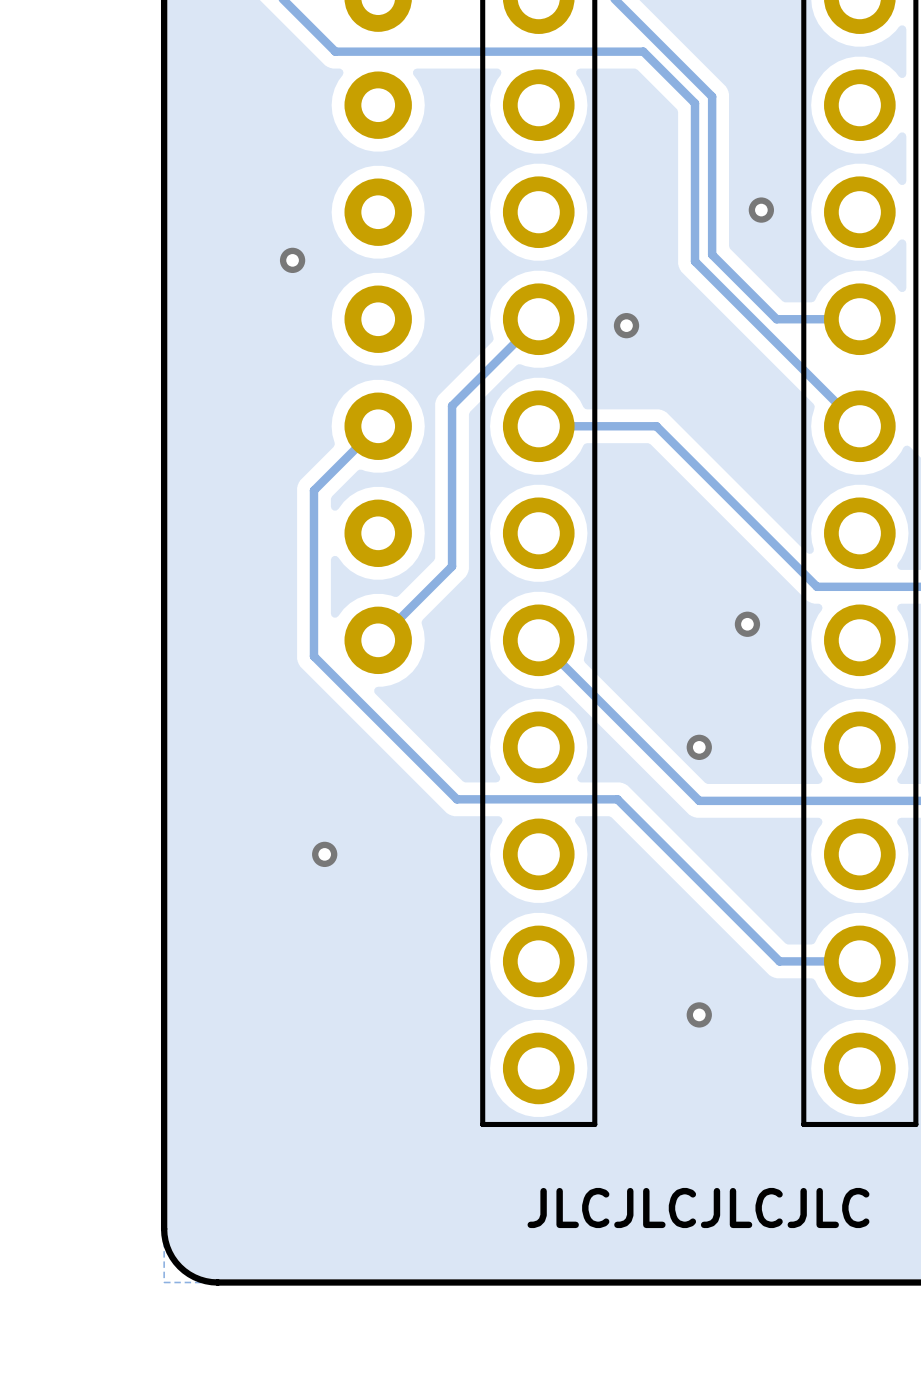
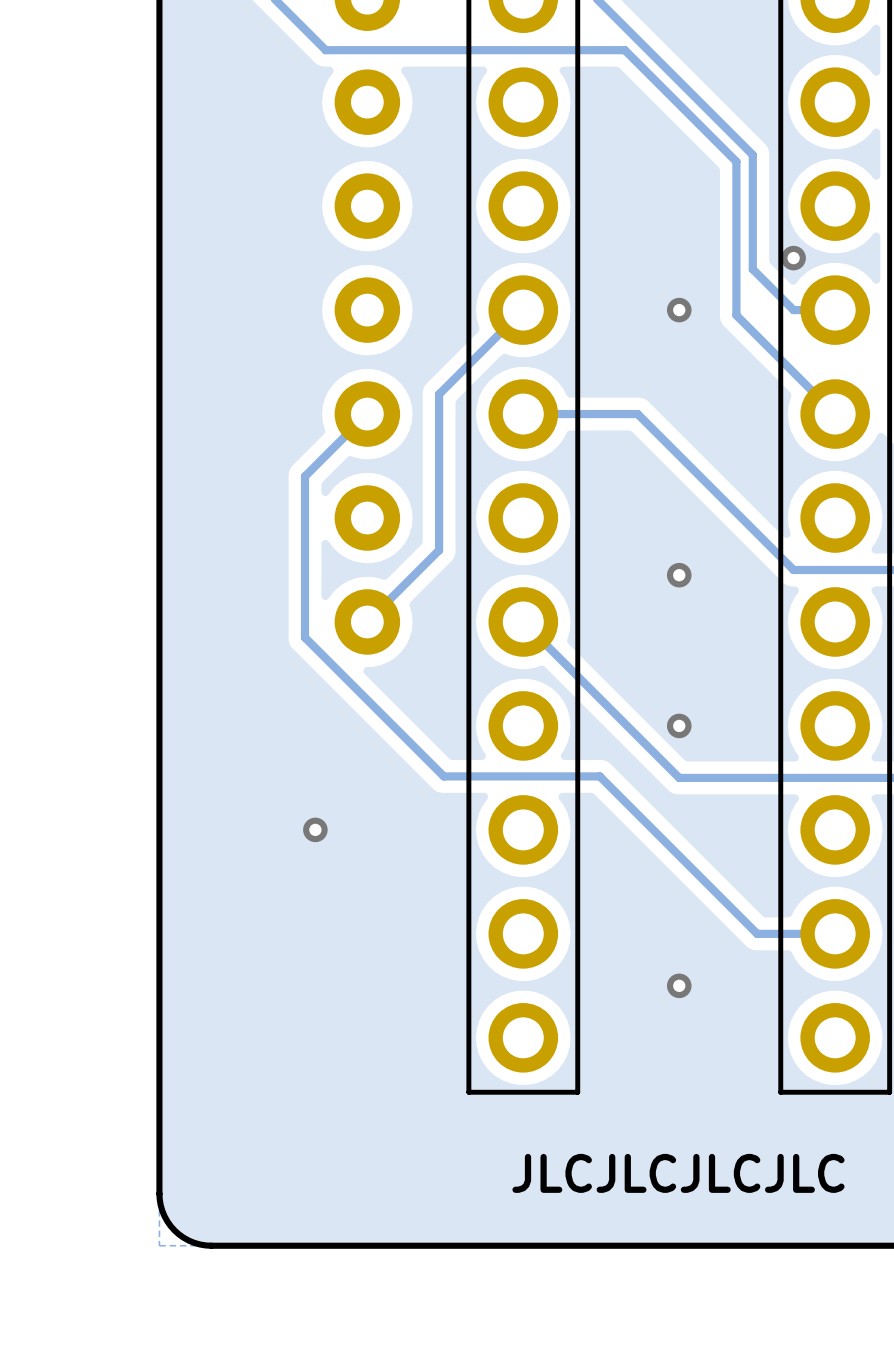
track: (712, 96) (712, 254) (776, 319) (817, 319) -> (691, 93) (752, 154) (752, 269) (793, 310)
track: (695, 103) (695, 261) (758, 324) -> (675, 100) (736, 161) (736, 315)
via: (761, 210) -> none
via: (292, 260) -> none
via: none -> (793, 258)
via: none -> (679, 310)
via: (626, 325) -> none
via position: (747, 624) -> (679, 575)

